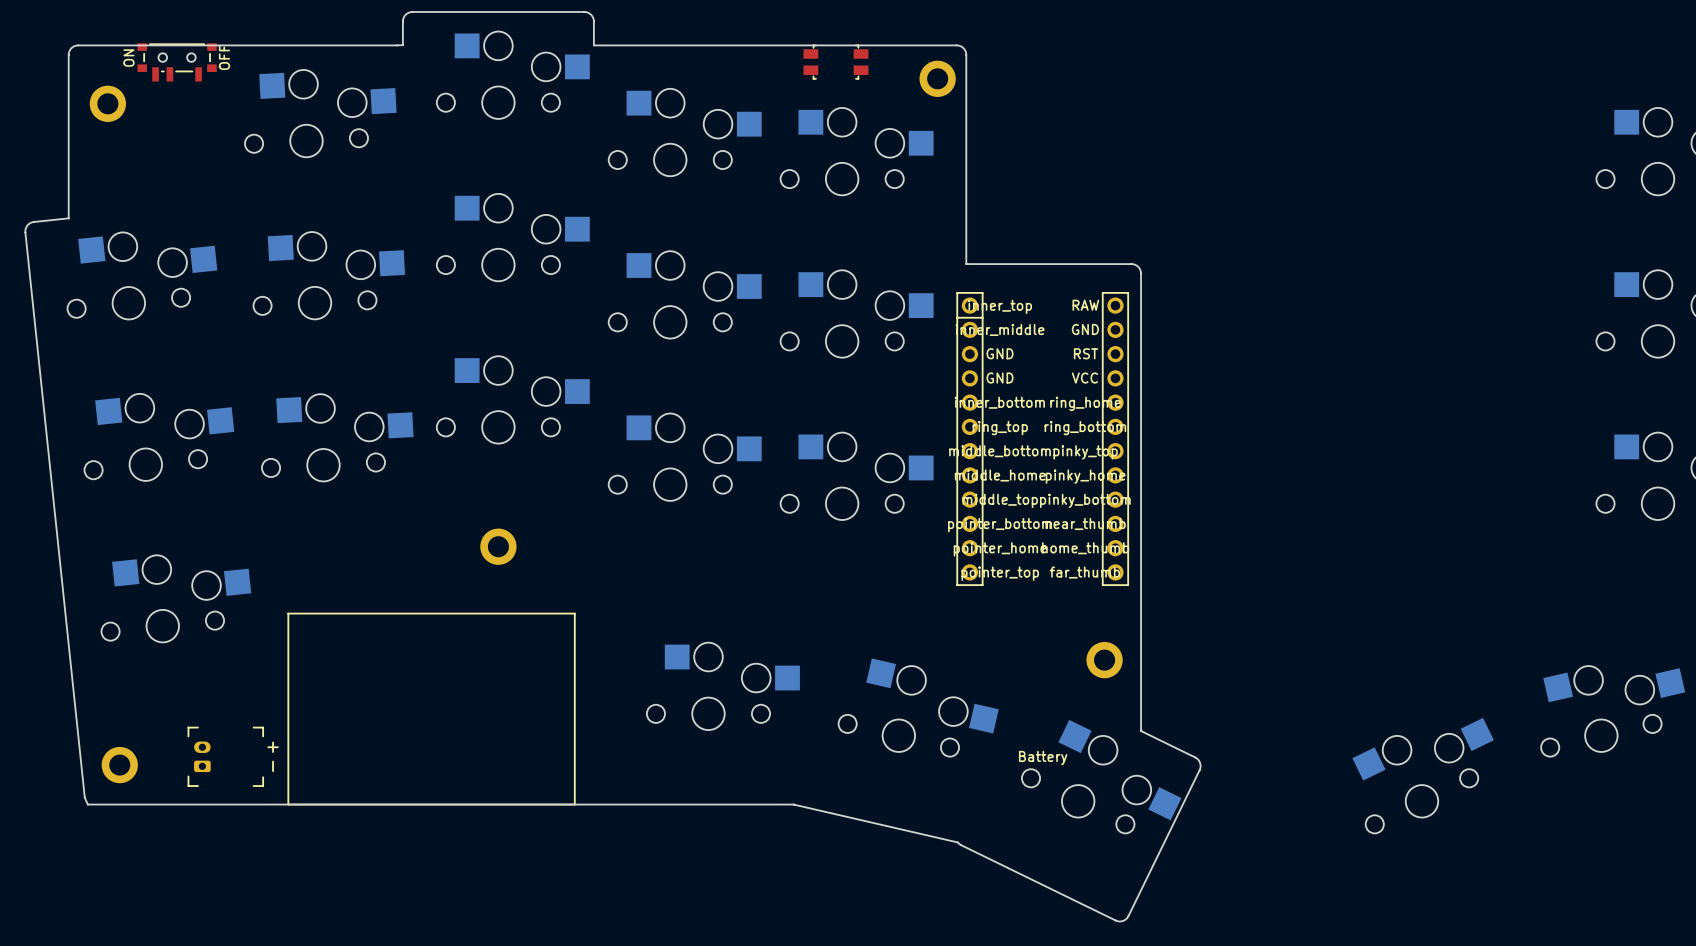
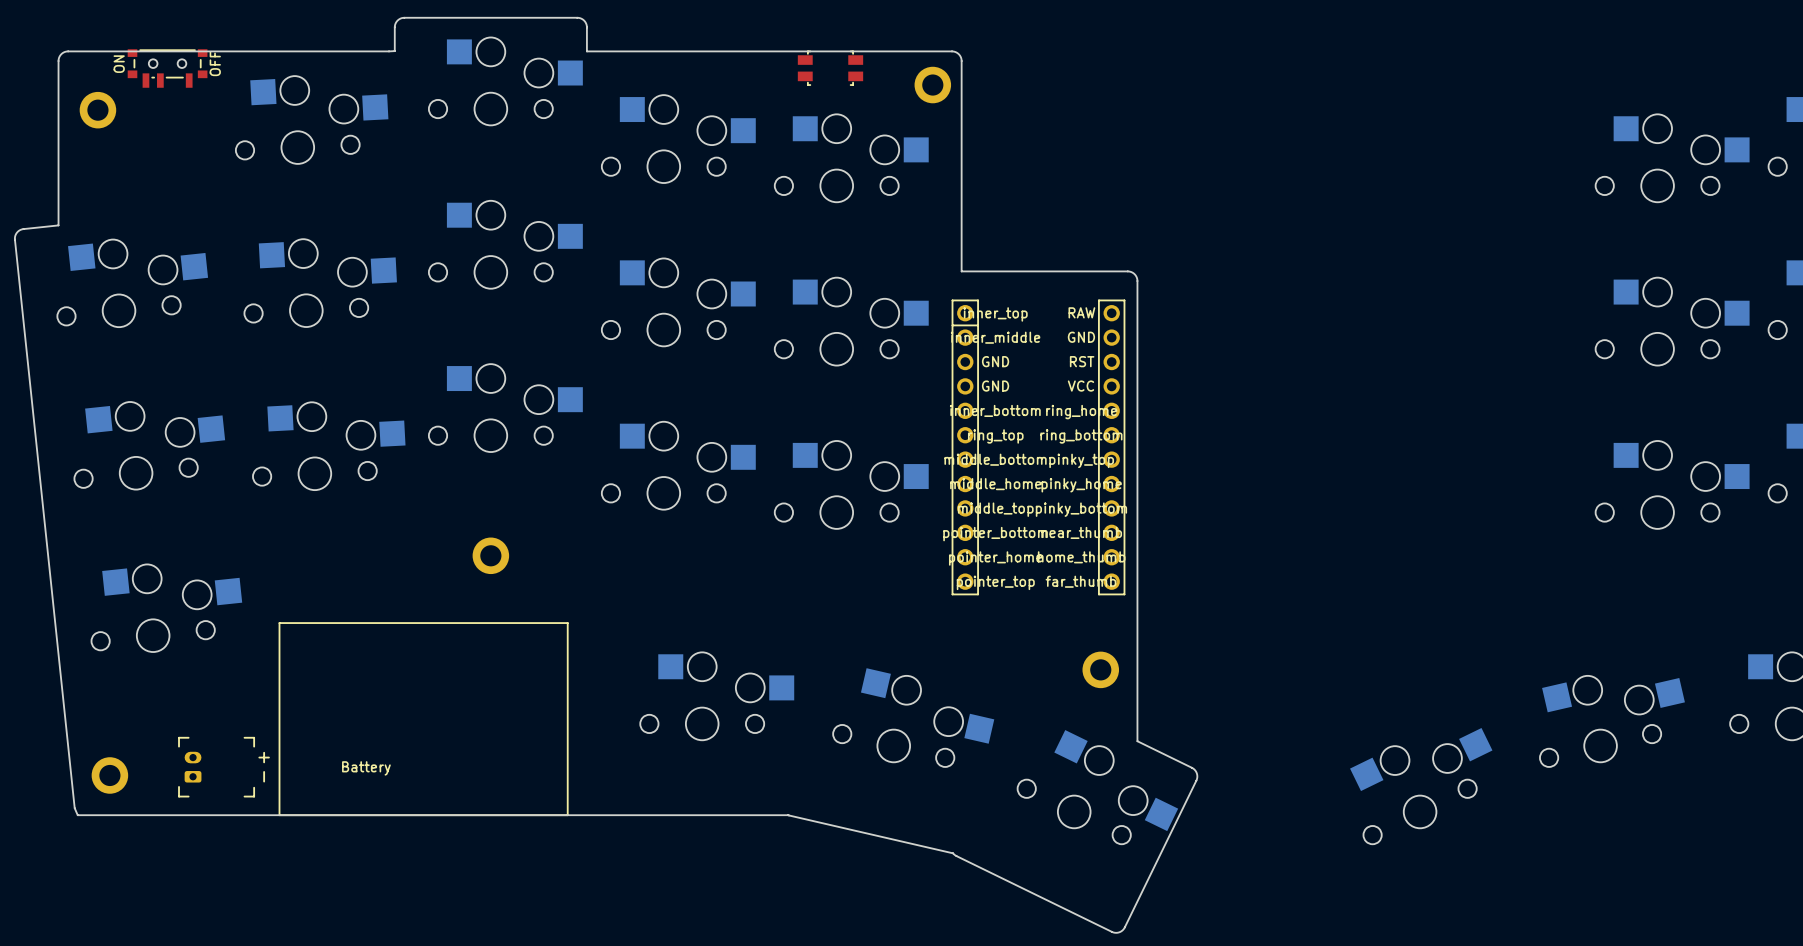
text: none -> Battery (366, 768)
text: Battery (1043, 758) -> none

